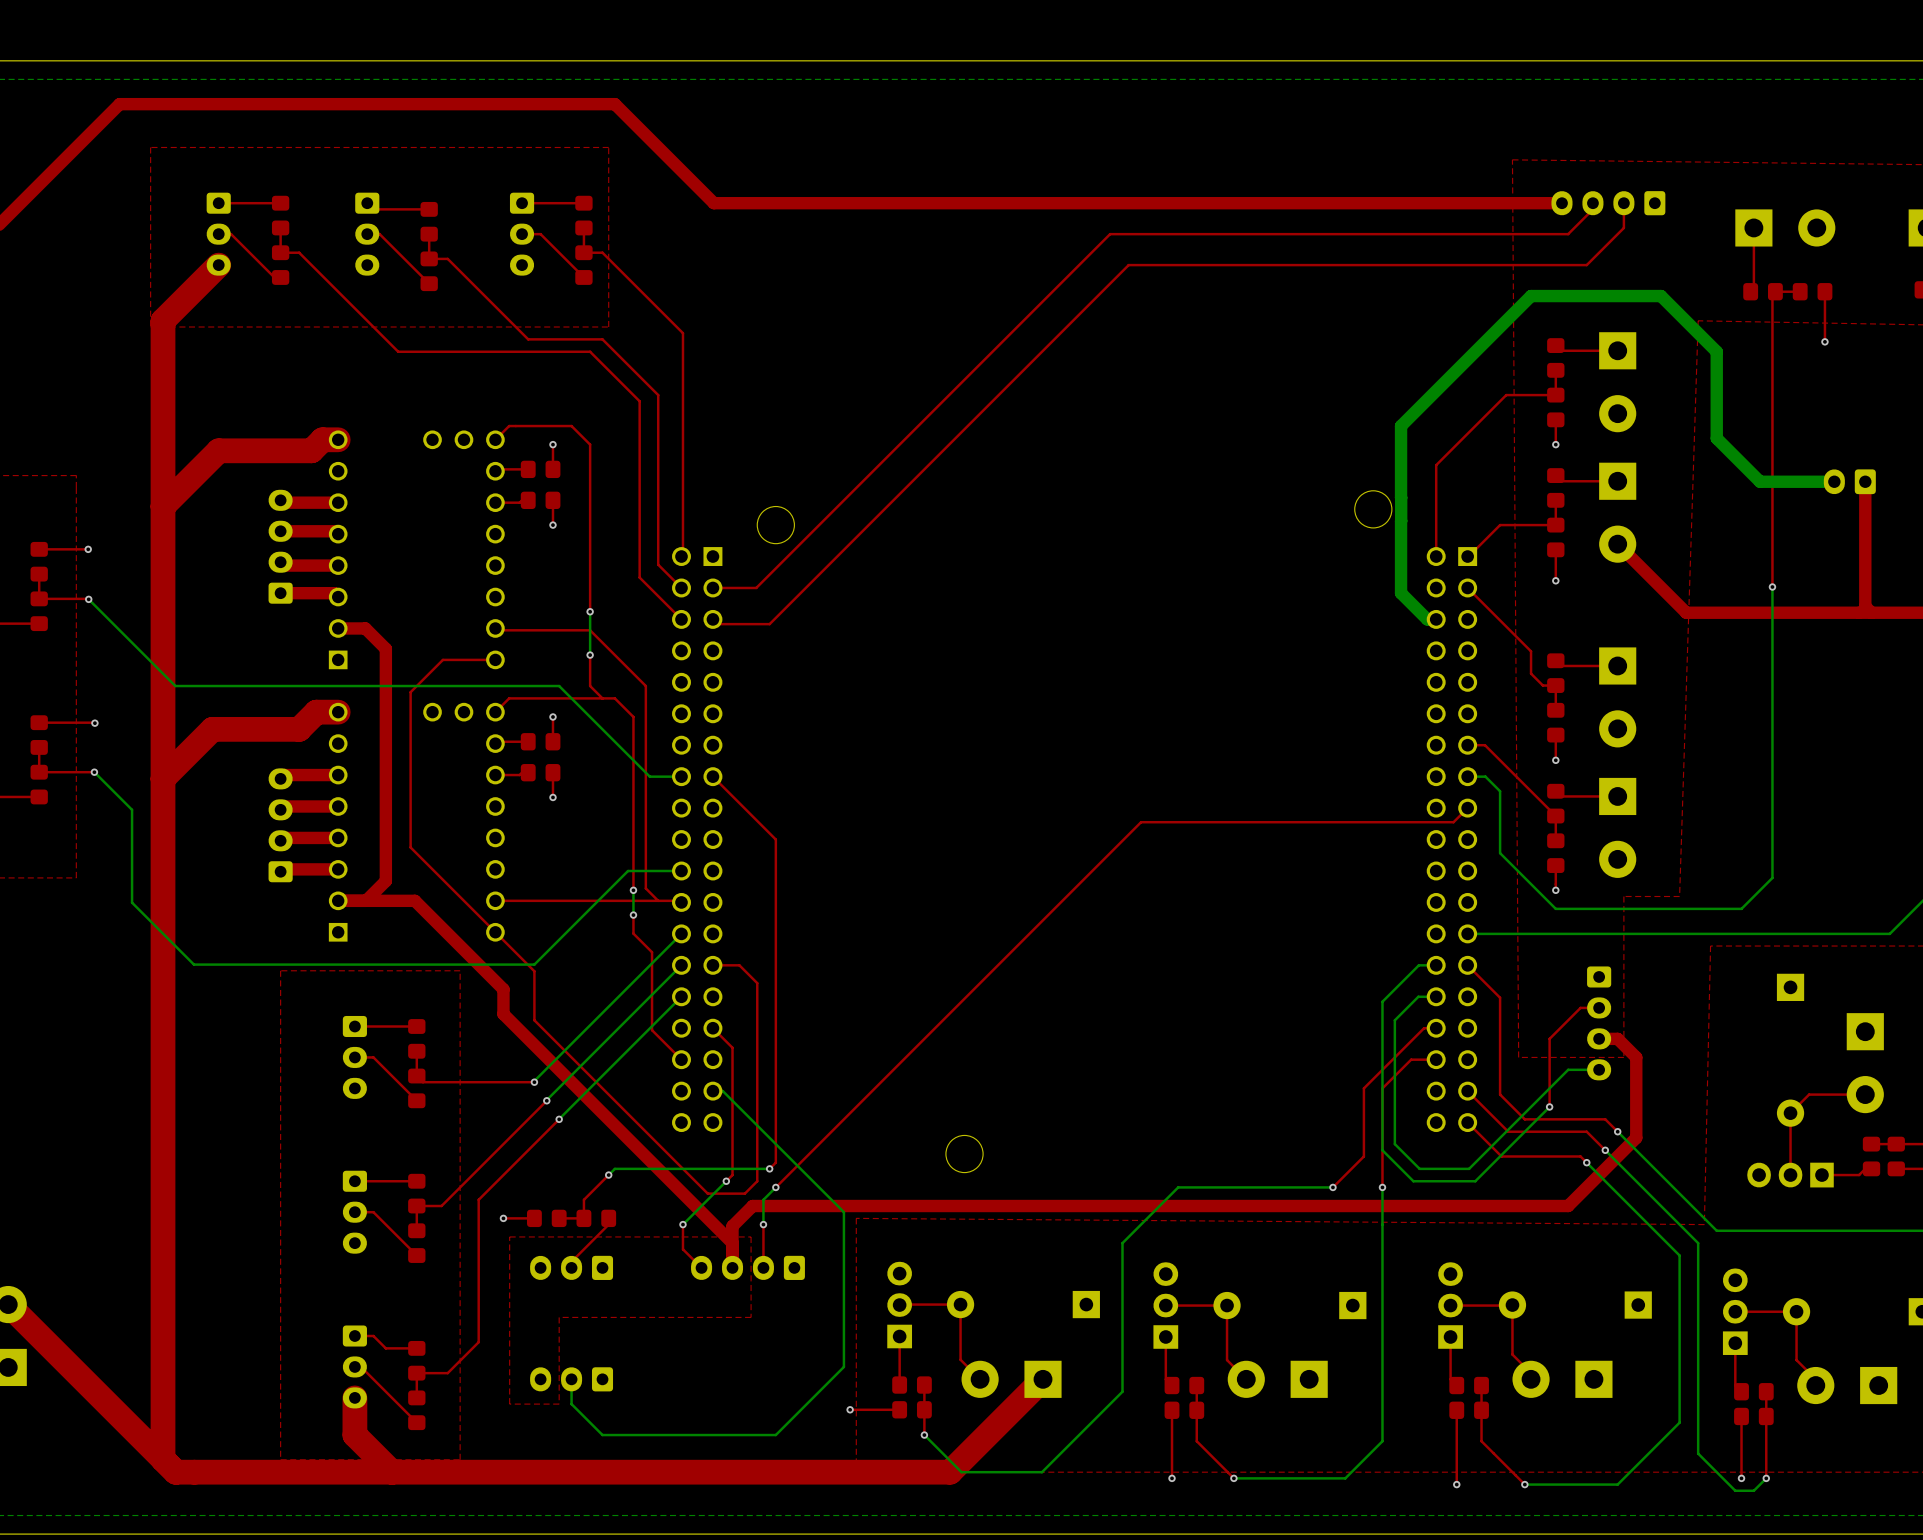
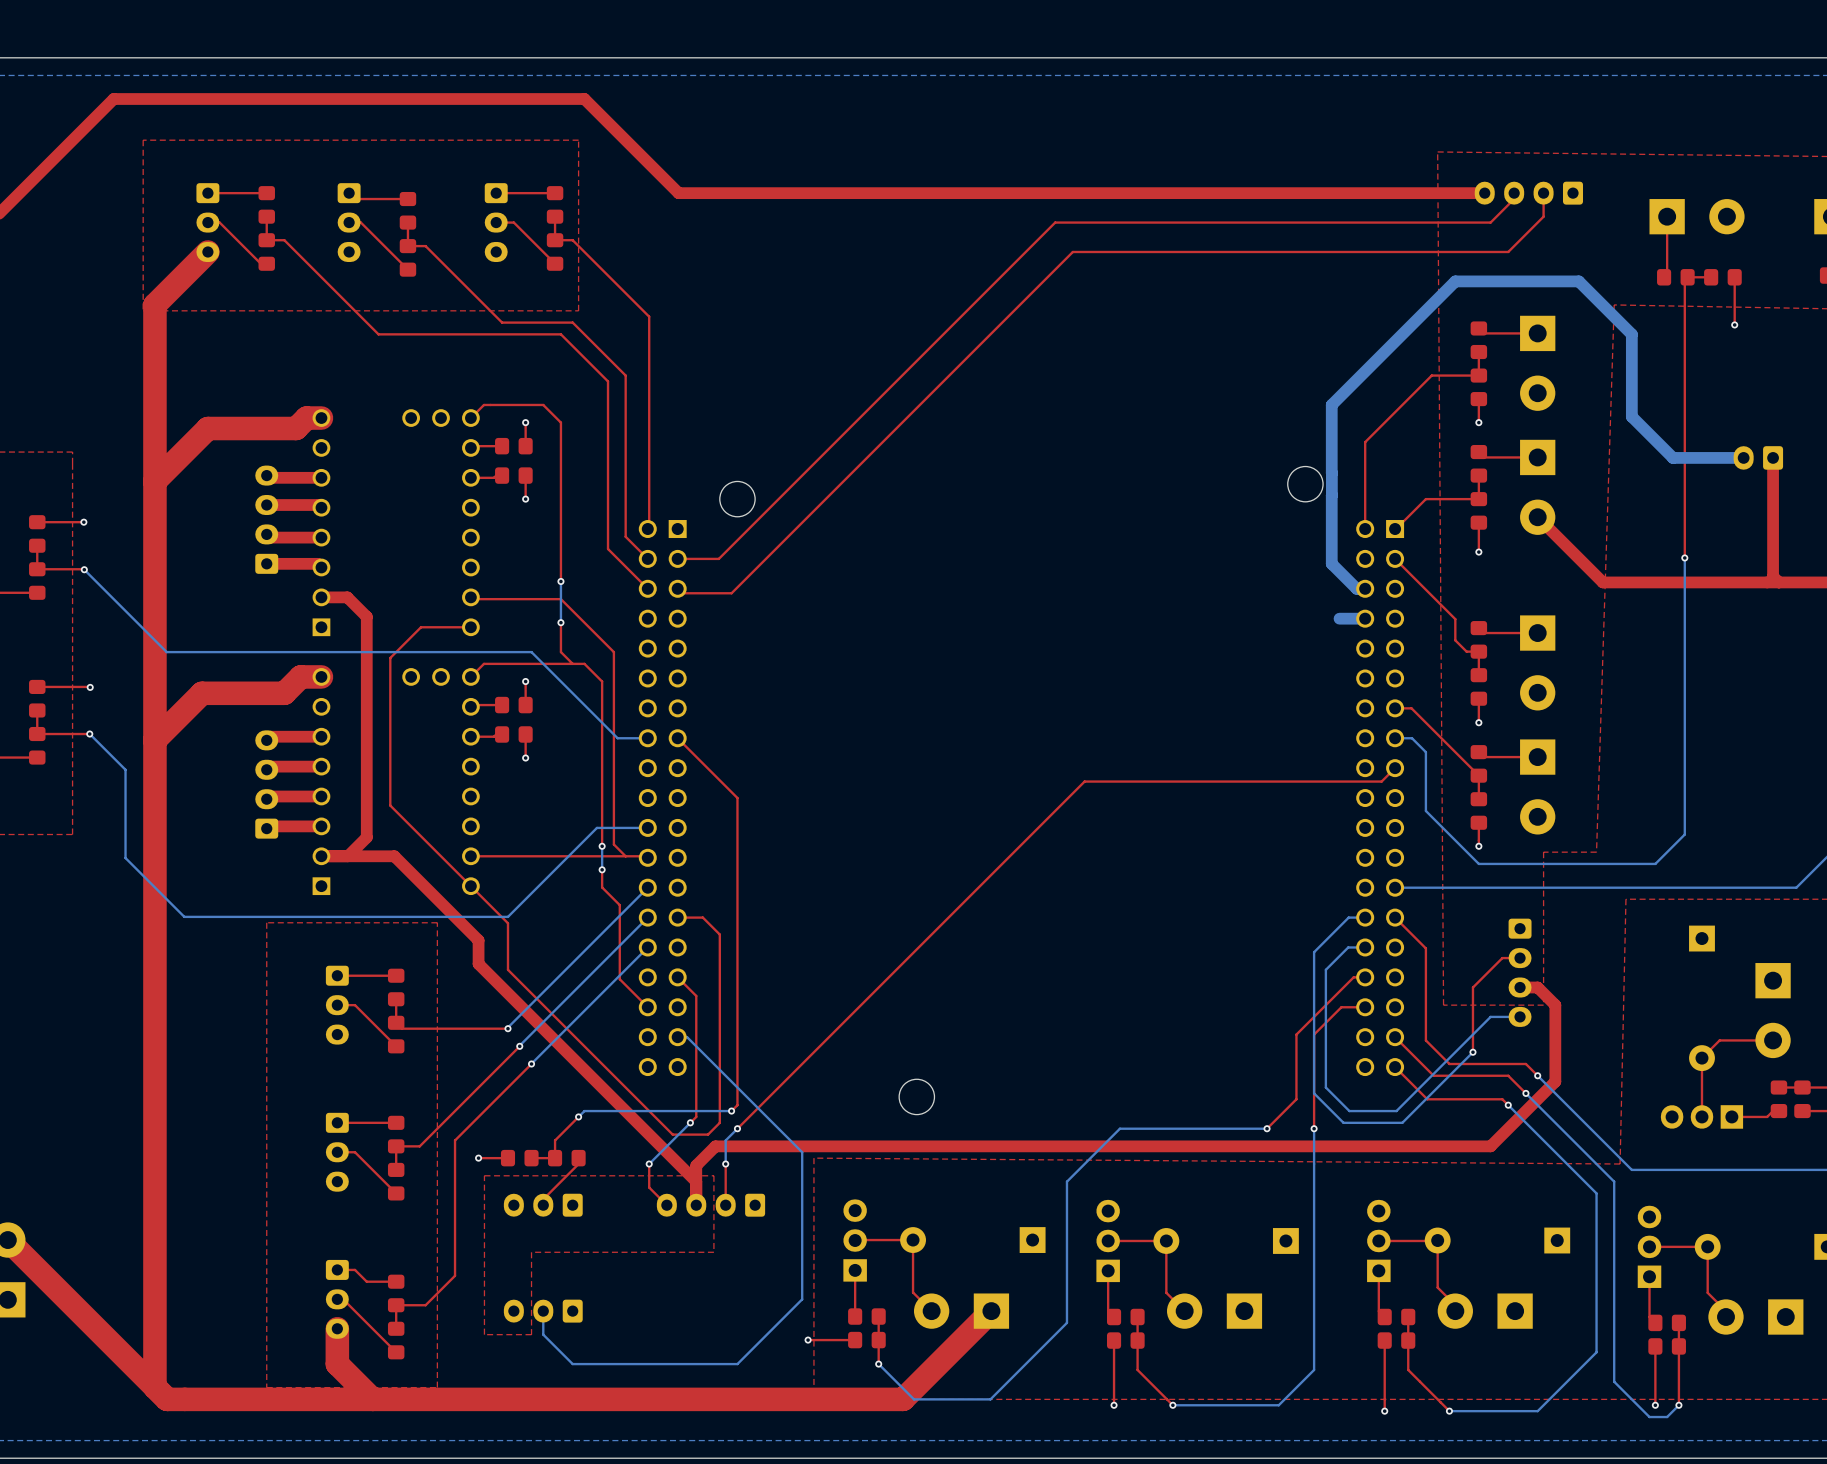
bottom track: none -> (1365, 618) (1339, 618)

